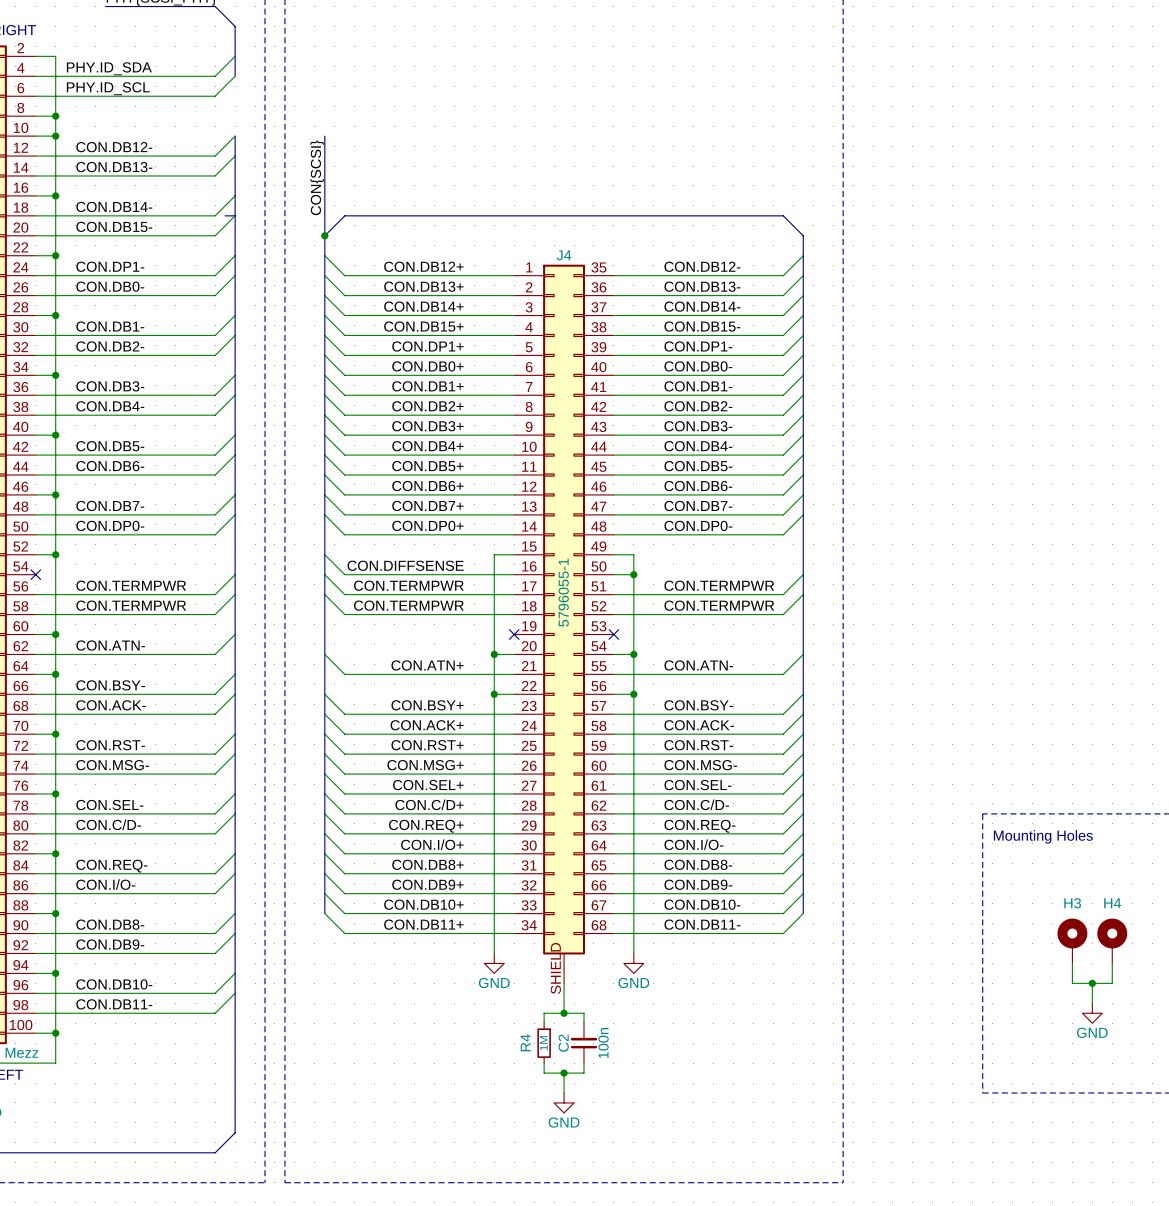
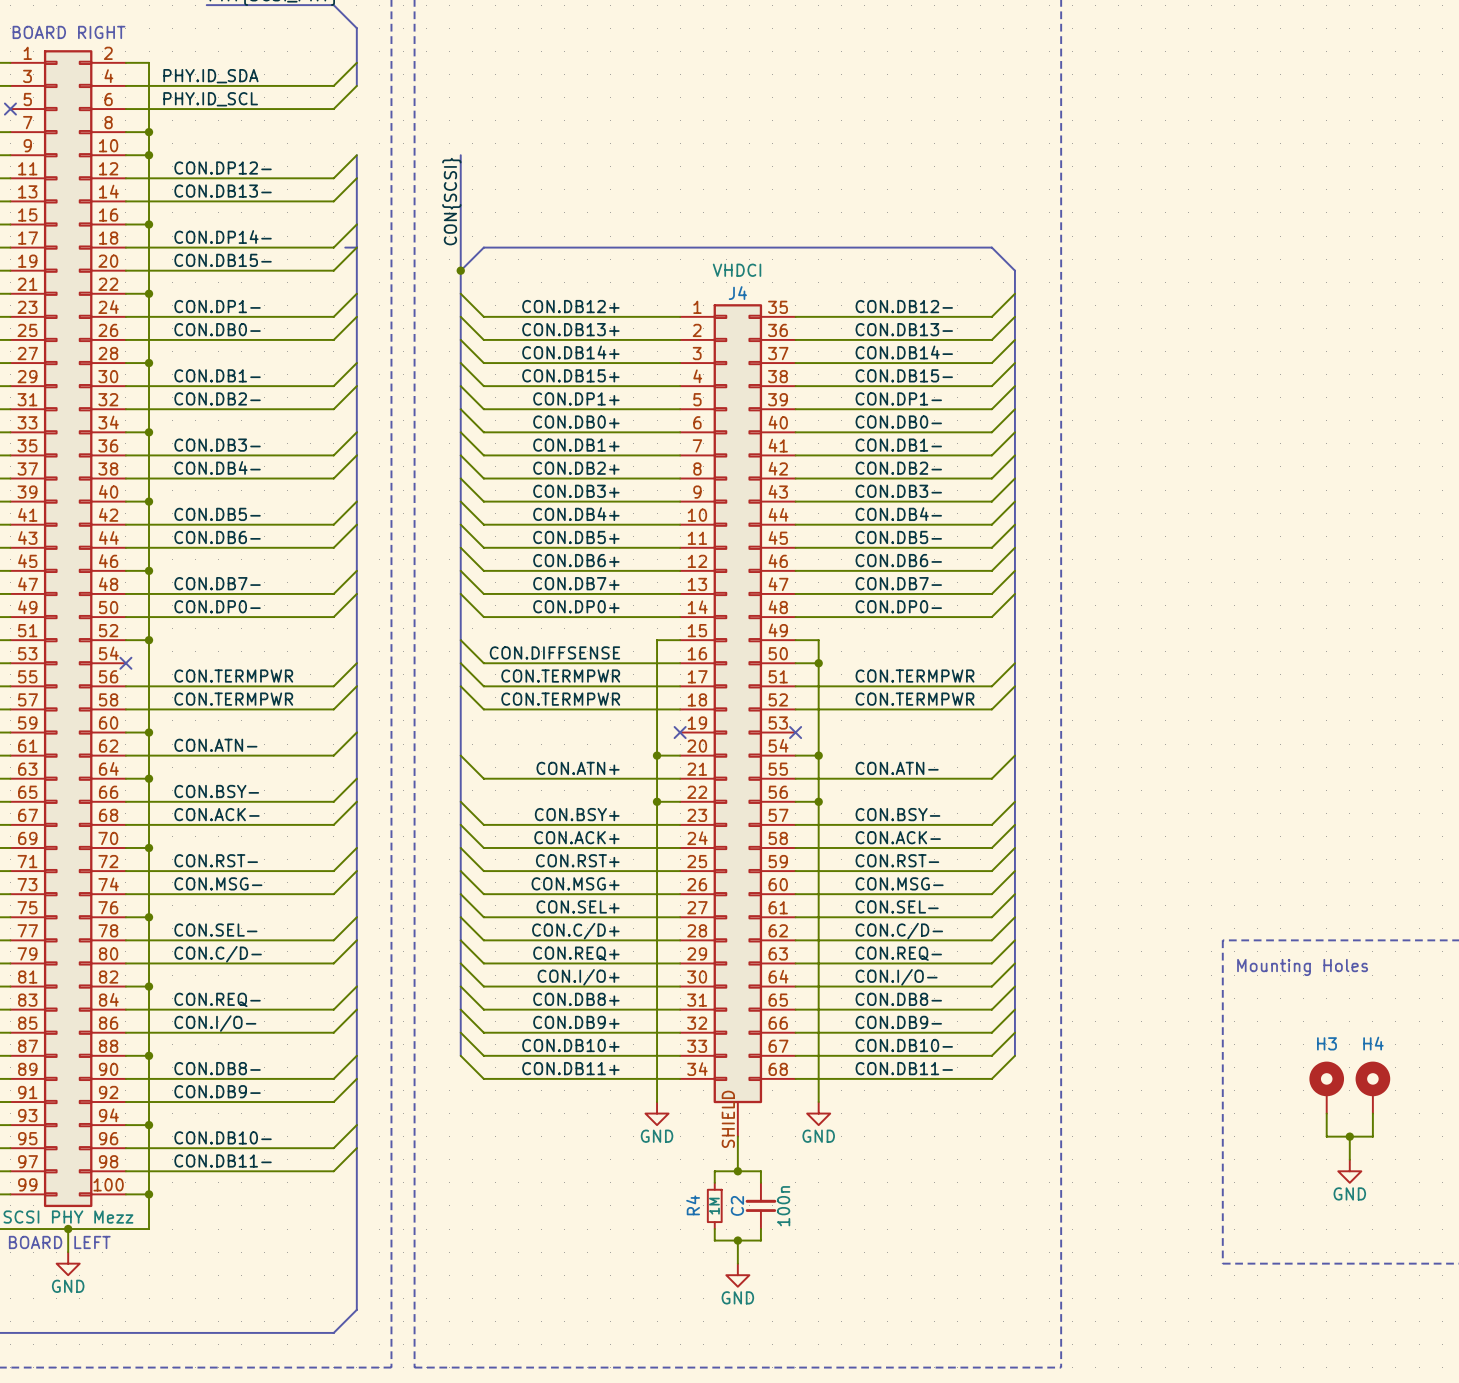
label: CON.DB12- (114, 147) -> CON.DP12- (223, 168)
label: CON.DB14- (114, 206) -> CON.DP14- (223, 237)
J4 value: 5796055-1 (563, 592) -> VHDCI (737, 270)

